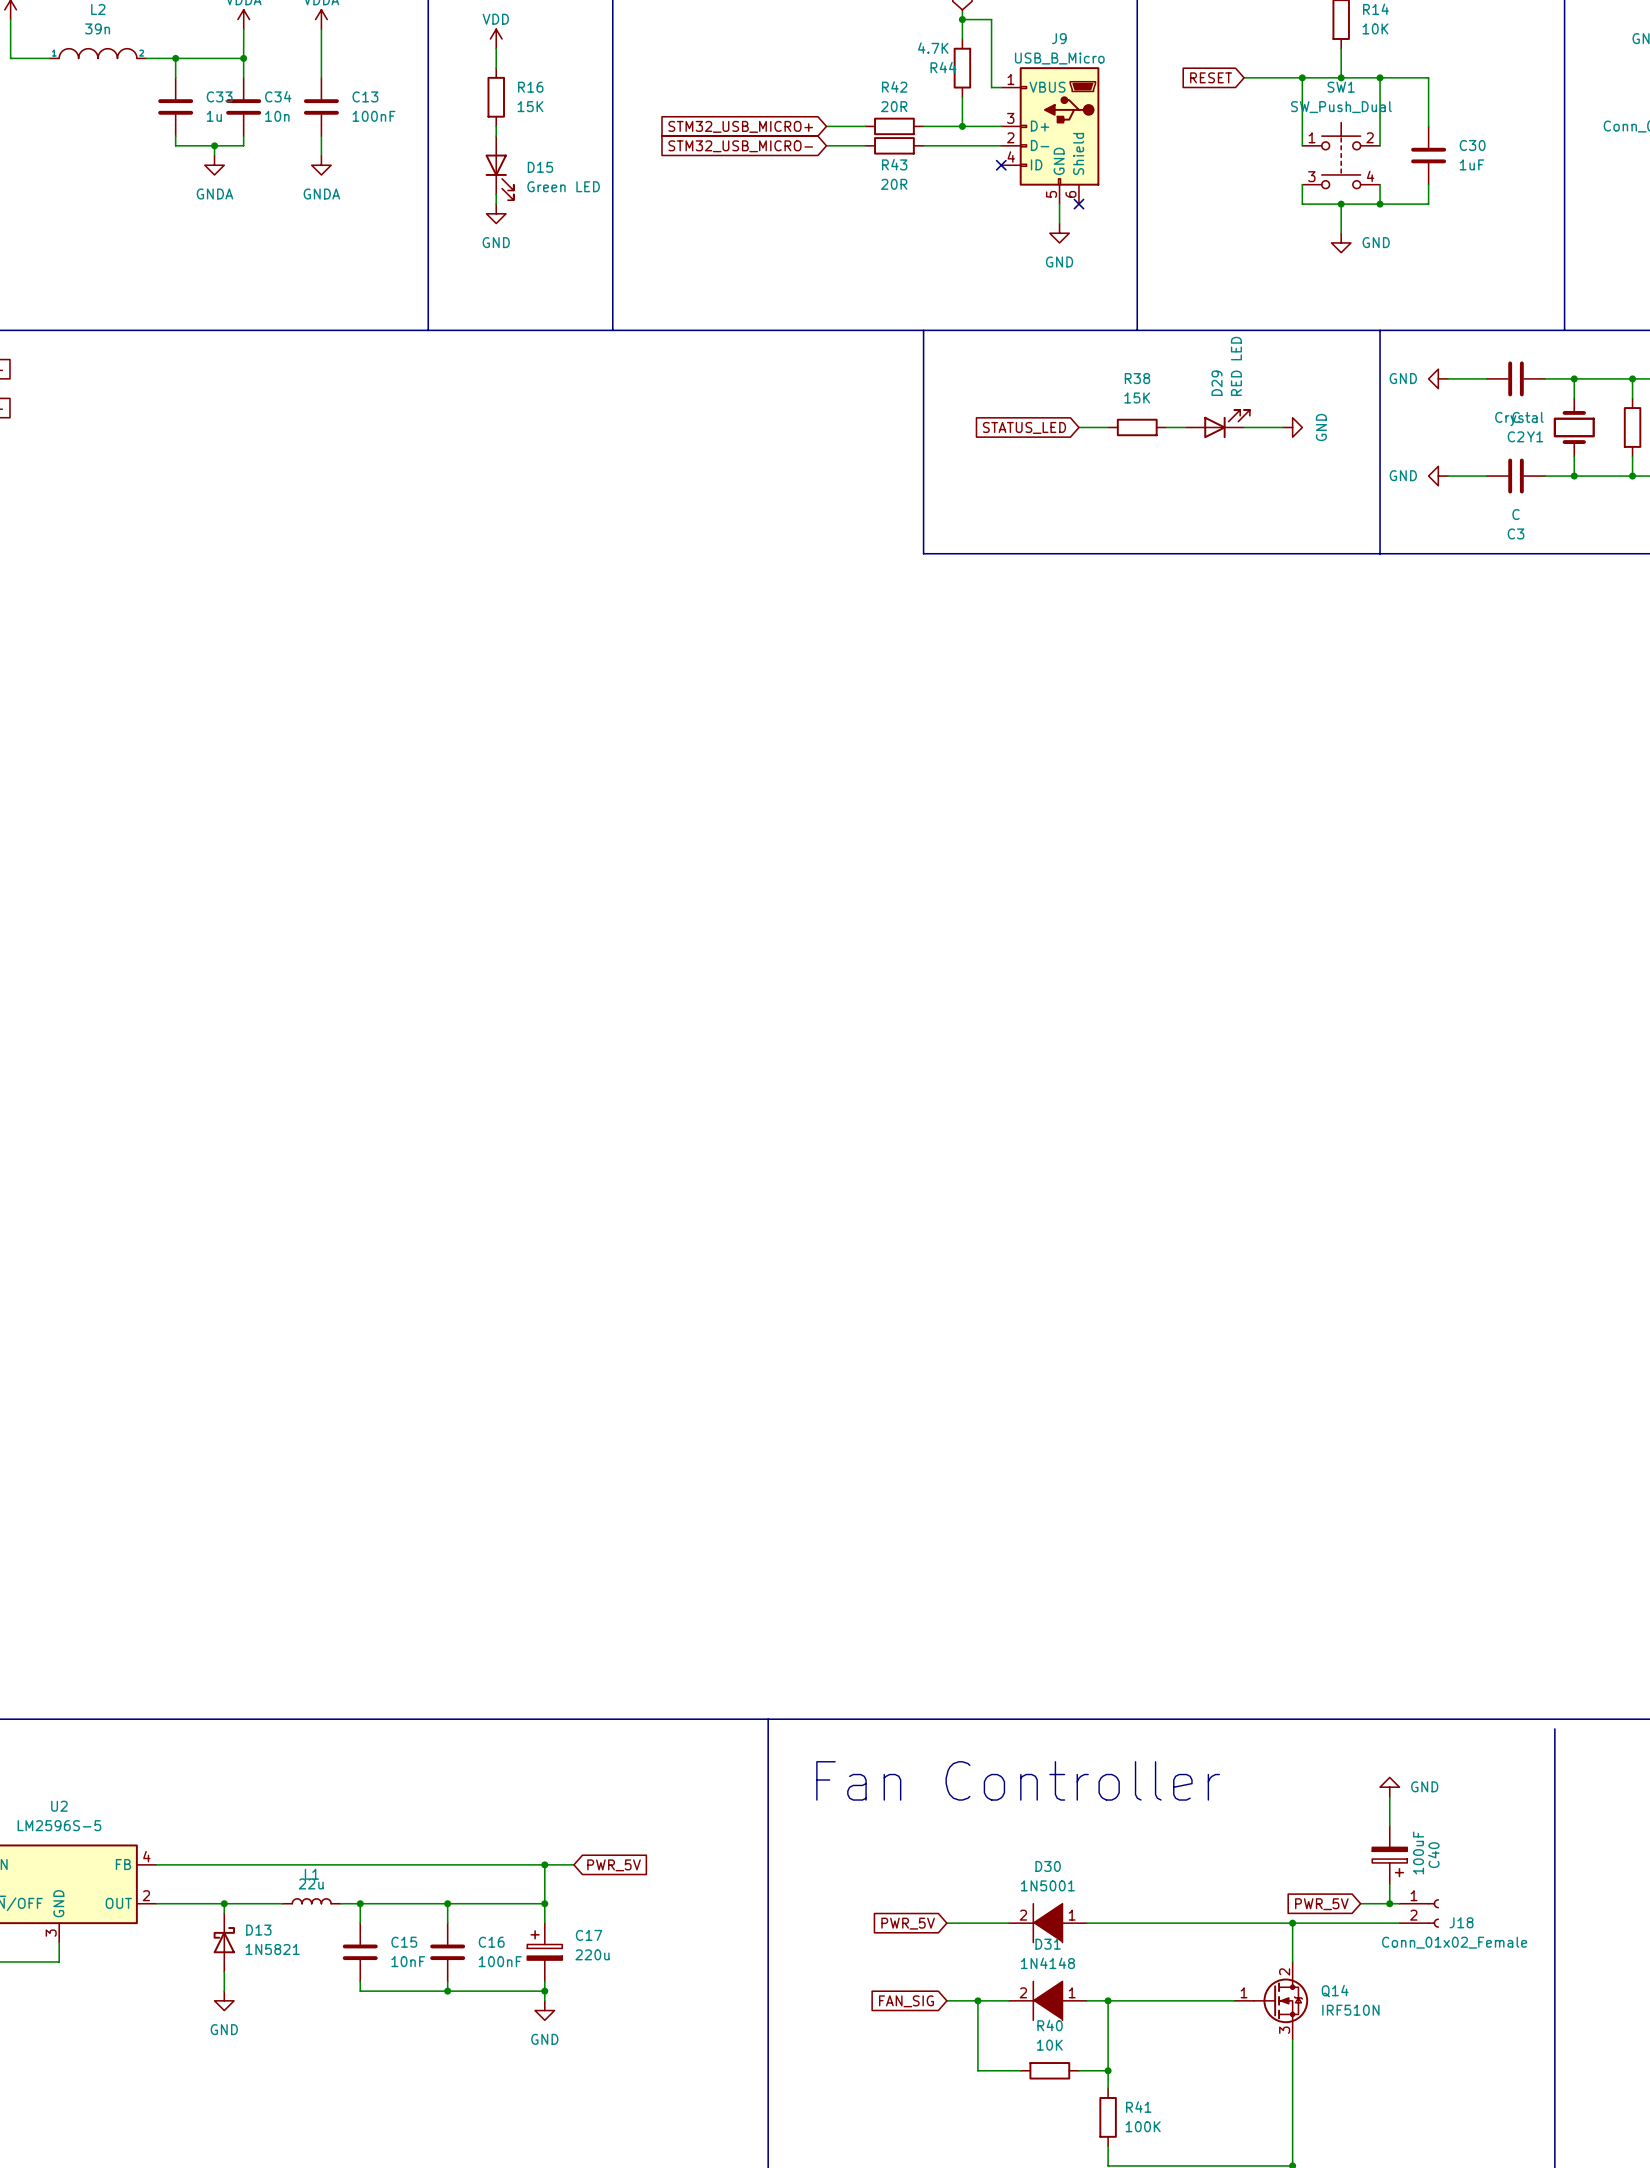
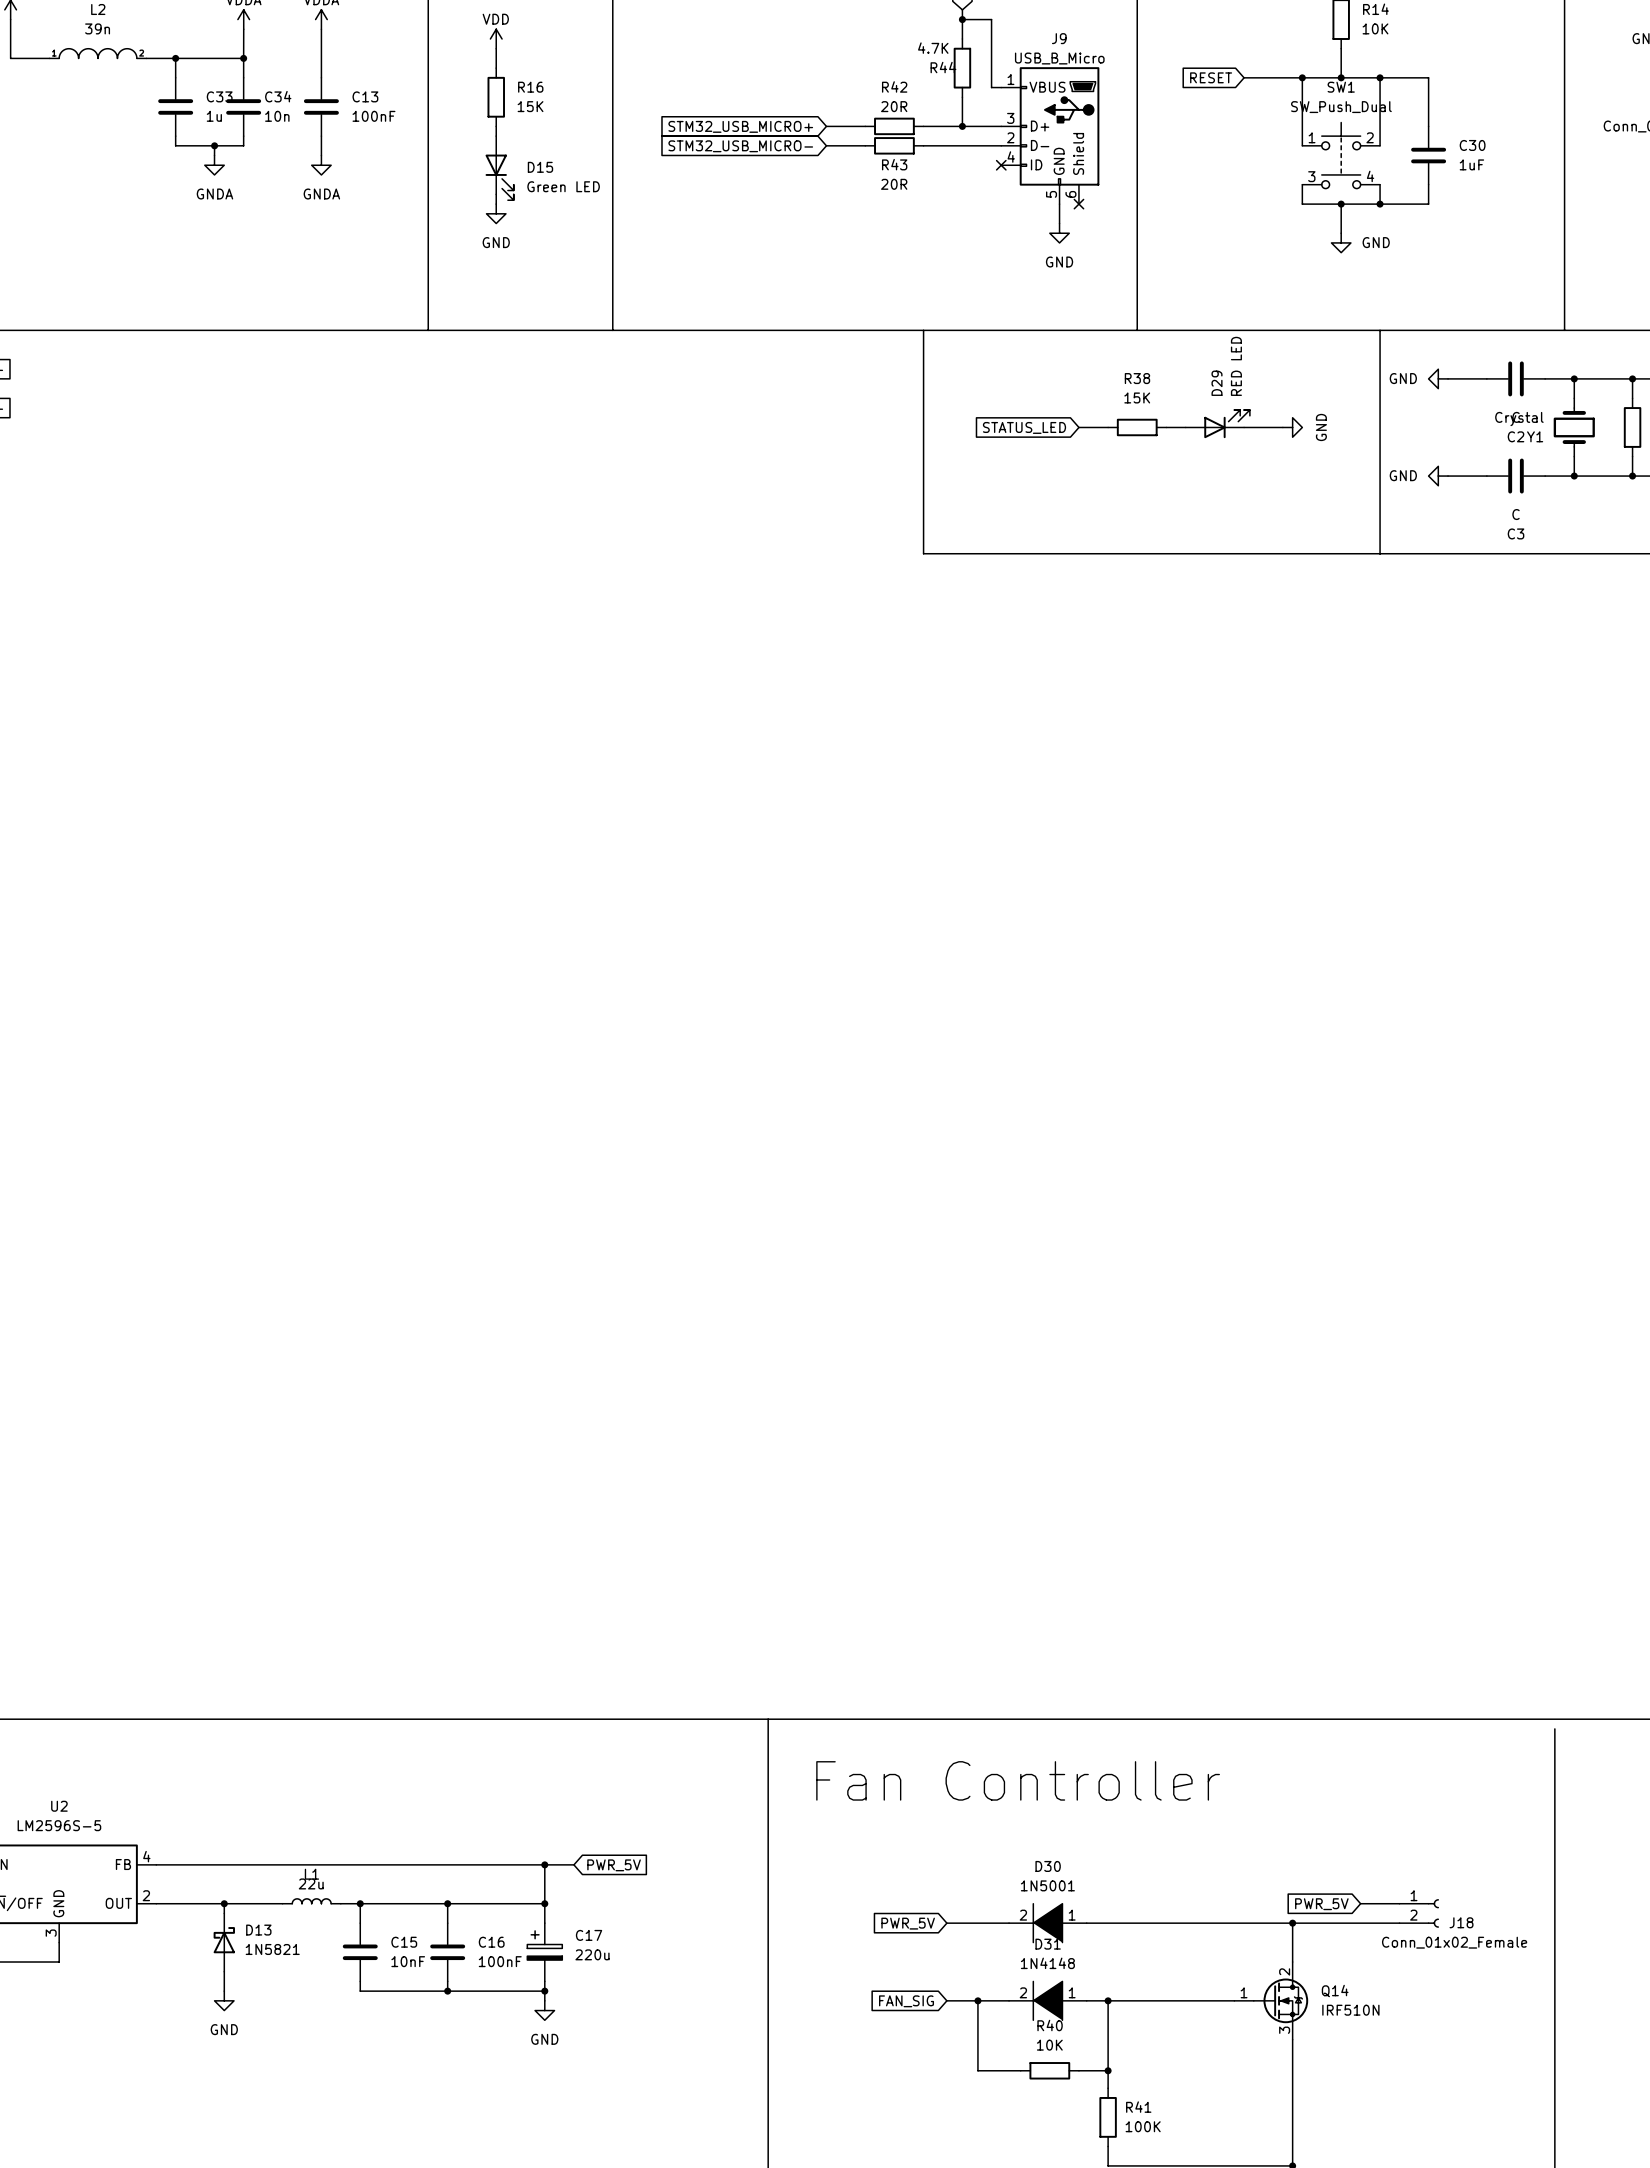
power symbol: GND (1389, 1787) -> none
wire: (1389, 1796) (1389, 1826) -> none
C40: 100uF (1389, 1855) -> none
wire: (1389, 1884) (1389, 1903) -> none
junction: (1389, 1903) -> none

